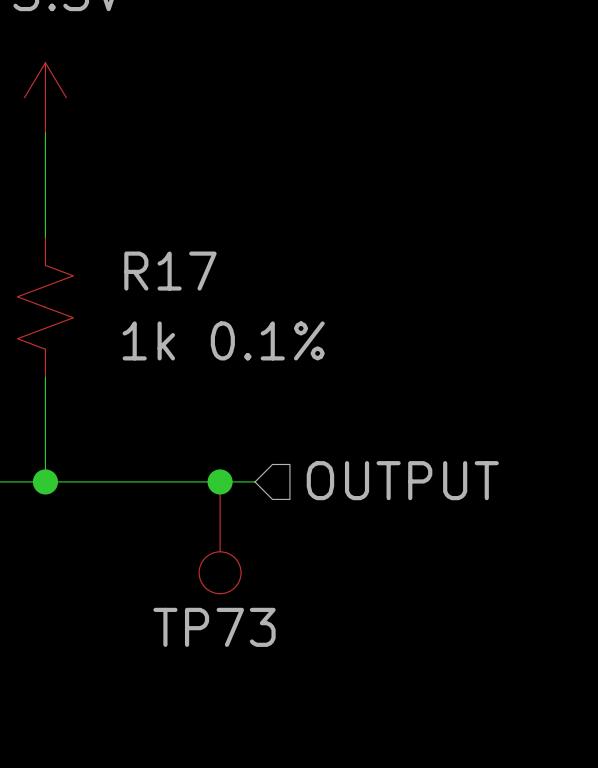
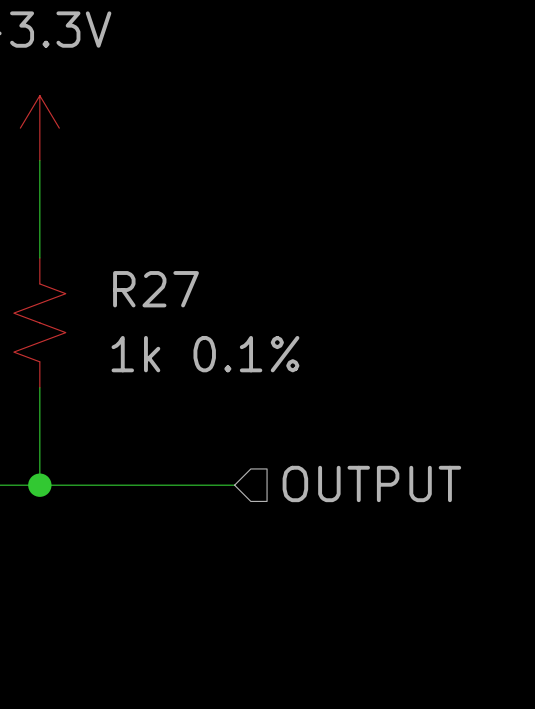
R17 name: R17 (170, 271) -> R27 (156, 289)
junction: (220, 481) -> none
TP73: (220, 537) -> none

